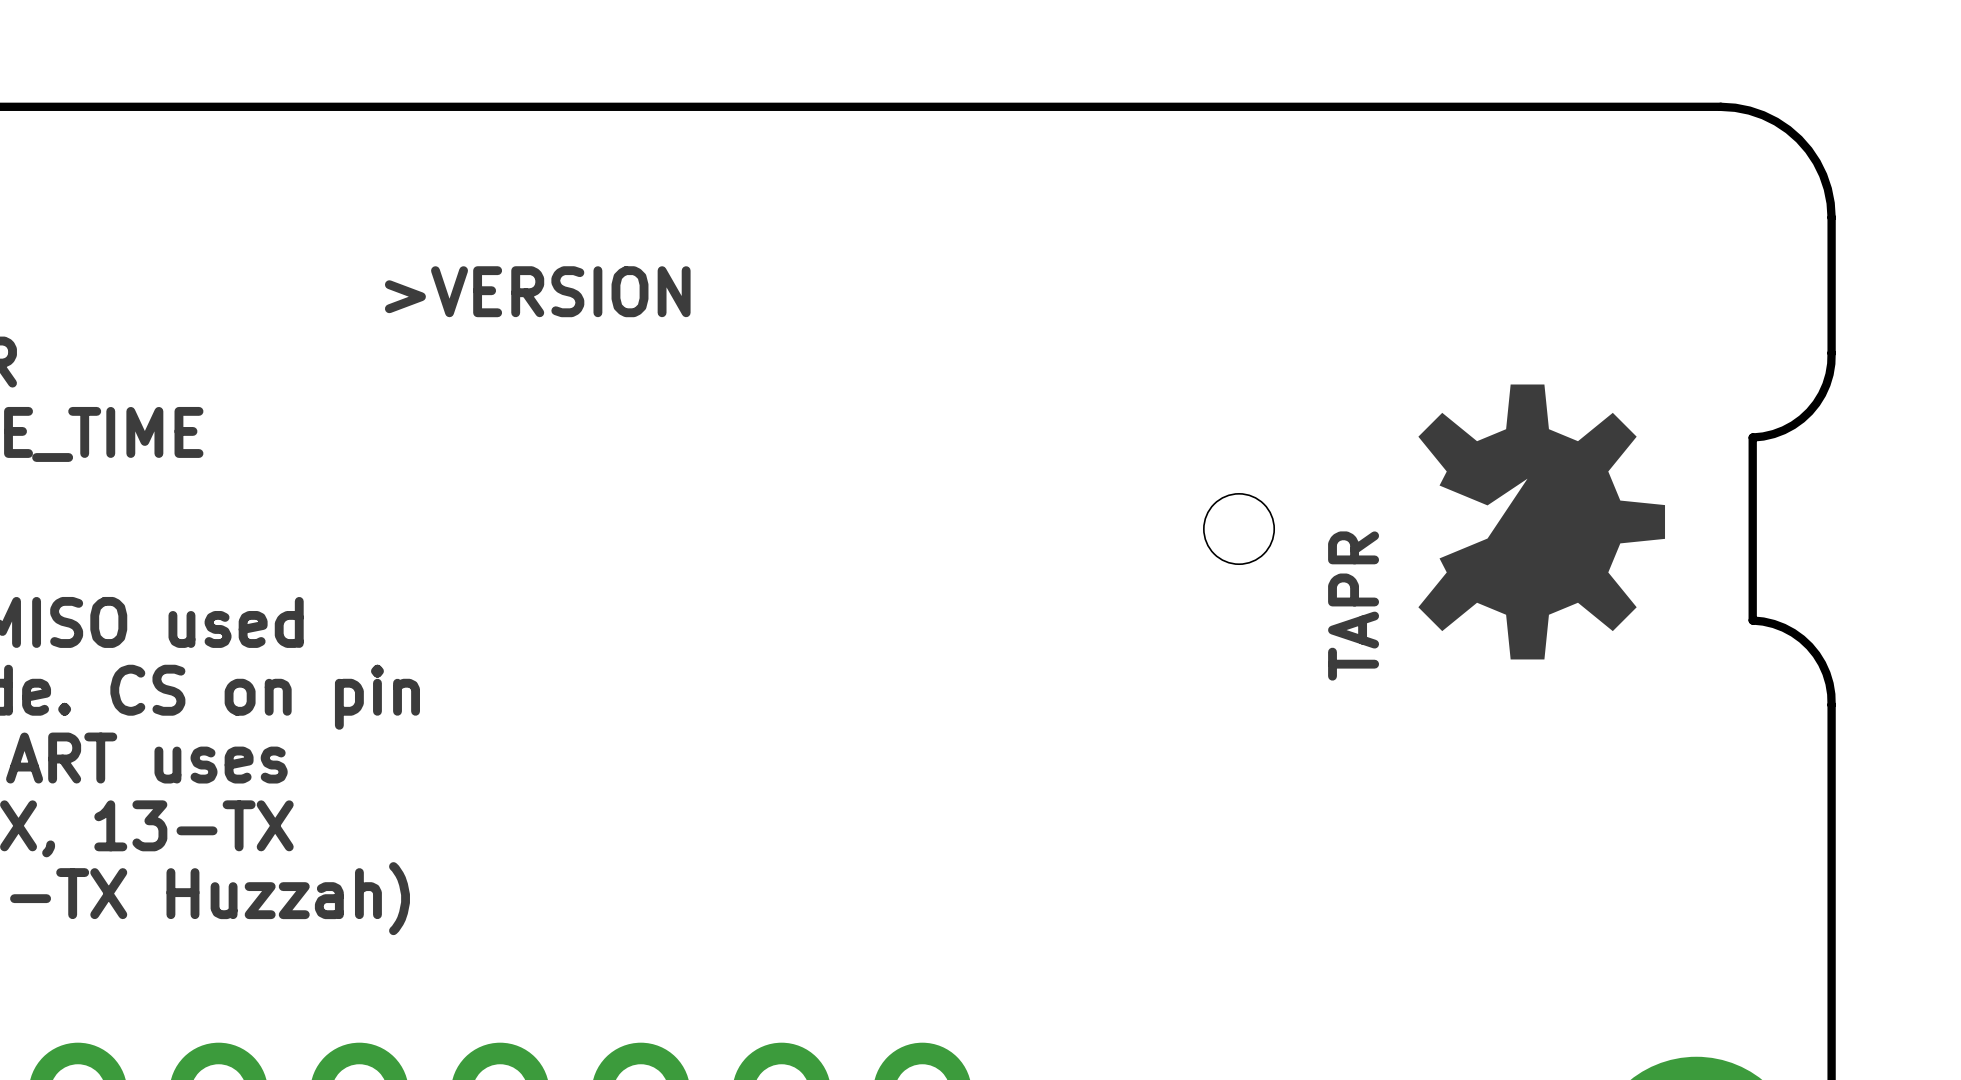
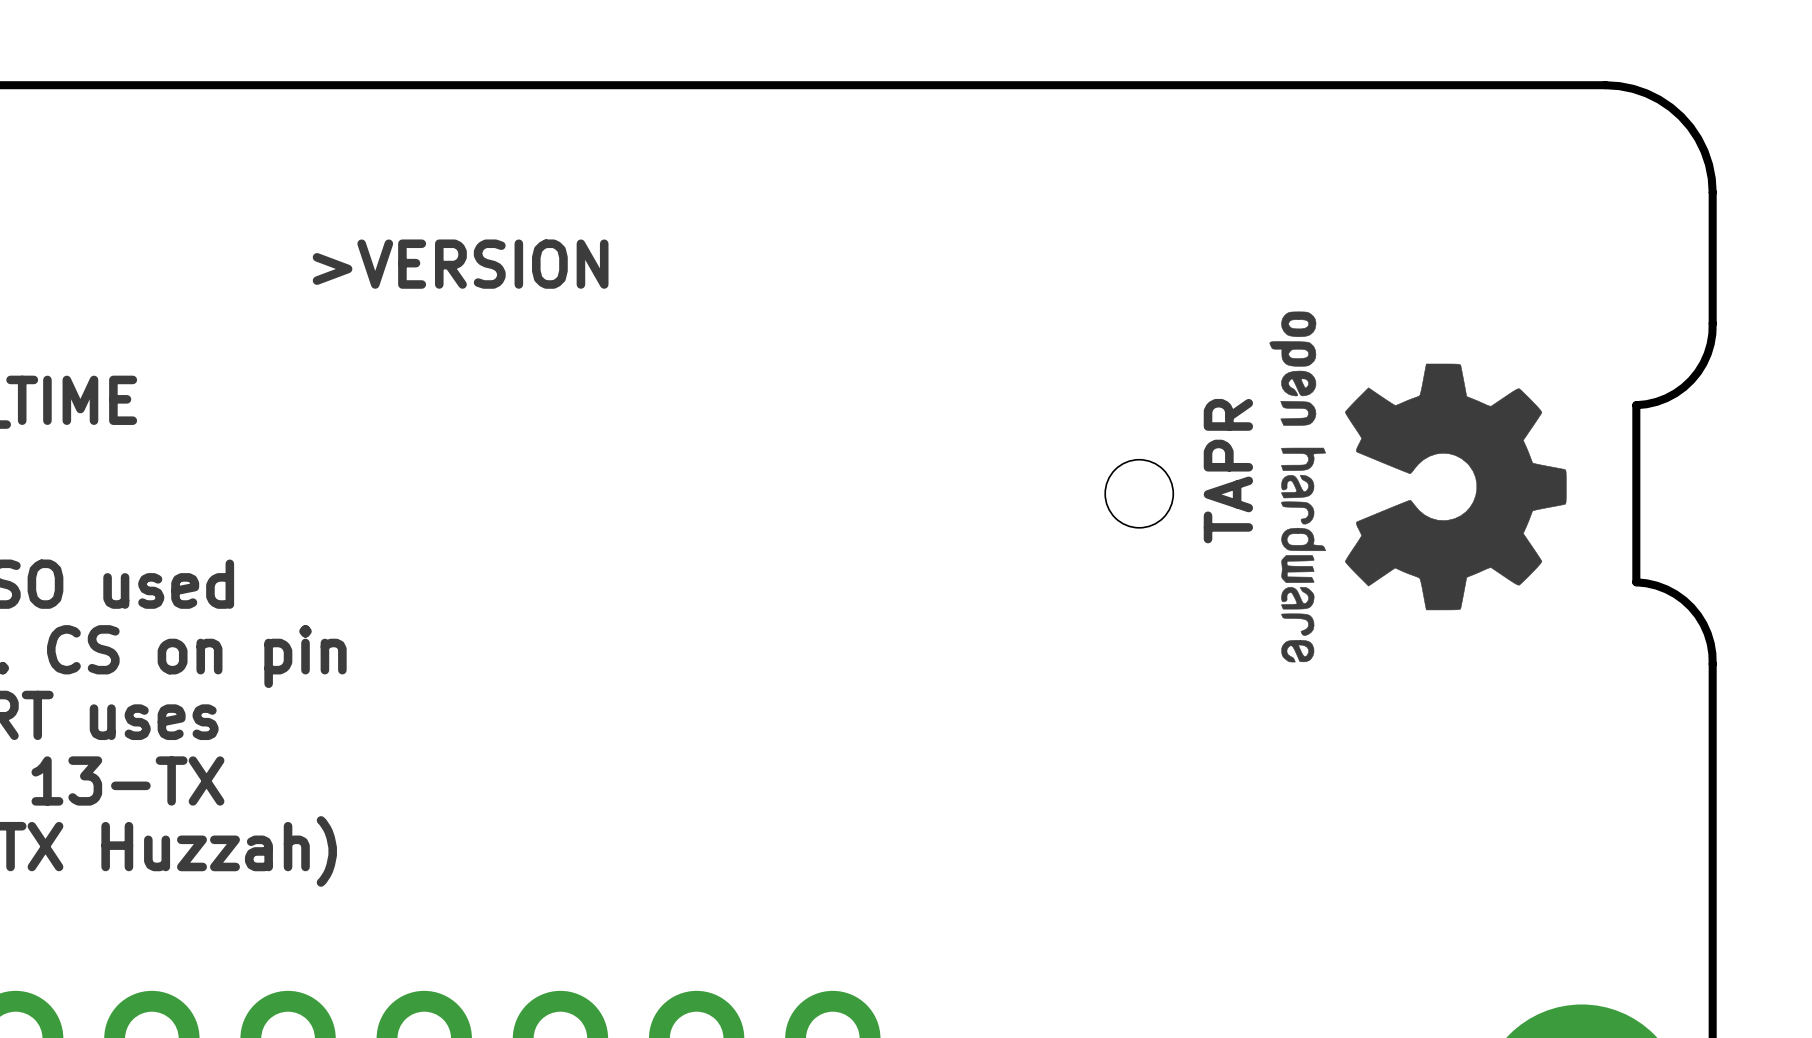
drawing shape: [1418, 384, 1666, 660] -> [1269, 311, 1567, 663]
text position: TAPR (1353, 606) -> TAPR (1228, 471)

